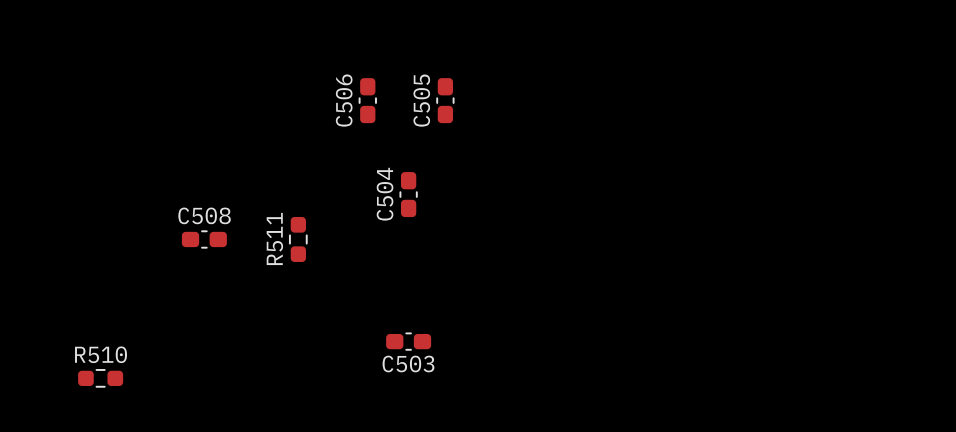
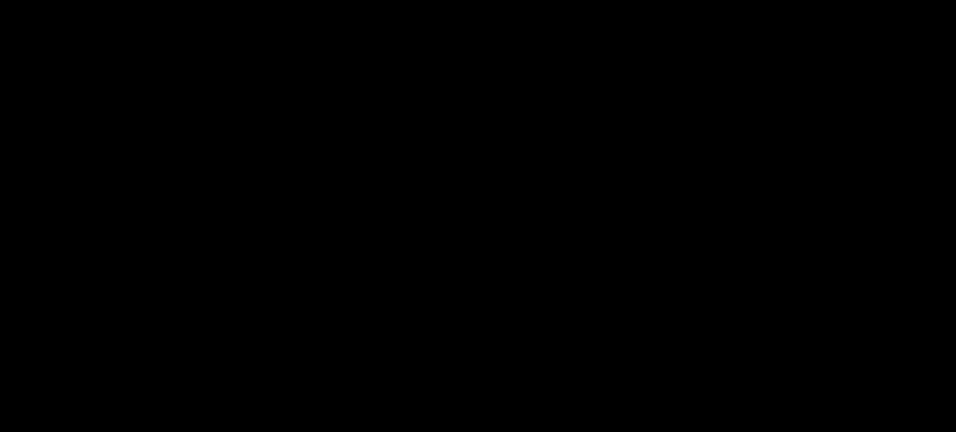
C506: (367, 100) -> none
C505: (445, 100) -> none
C504: (408, 194) -> none
C508: (204, 239) -> none
R511: (298, 239) -> none
C503: (408, 341) -> none
R510: (100, 378) -> none

